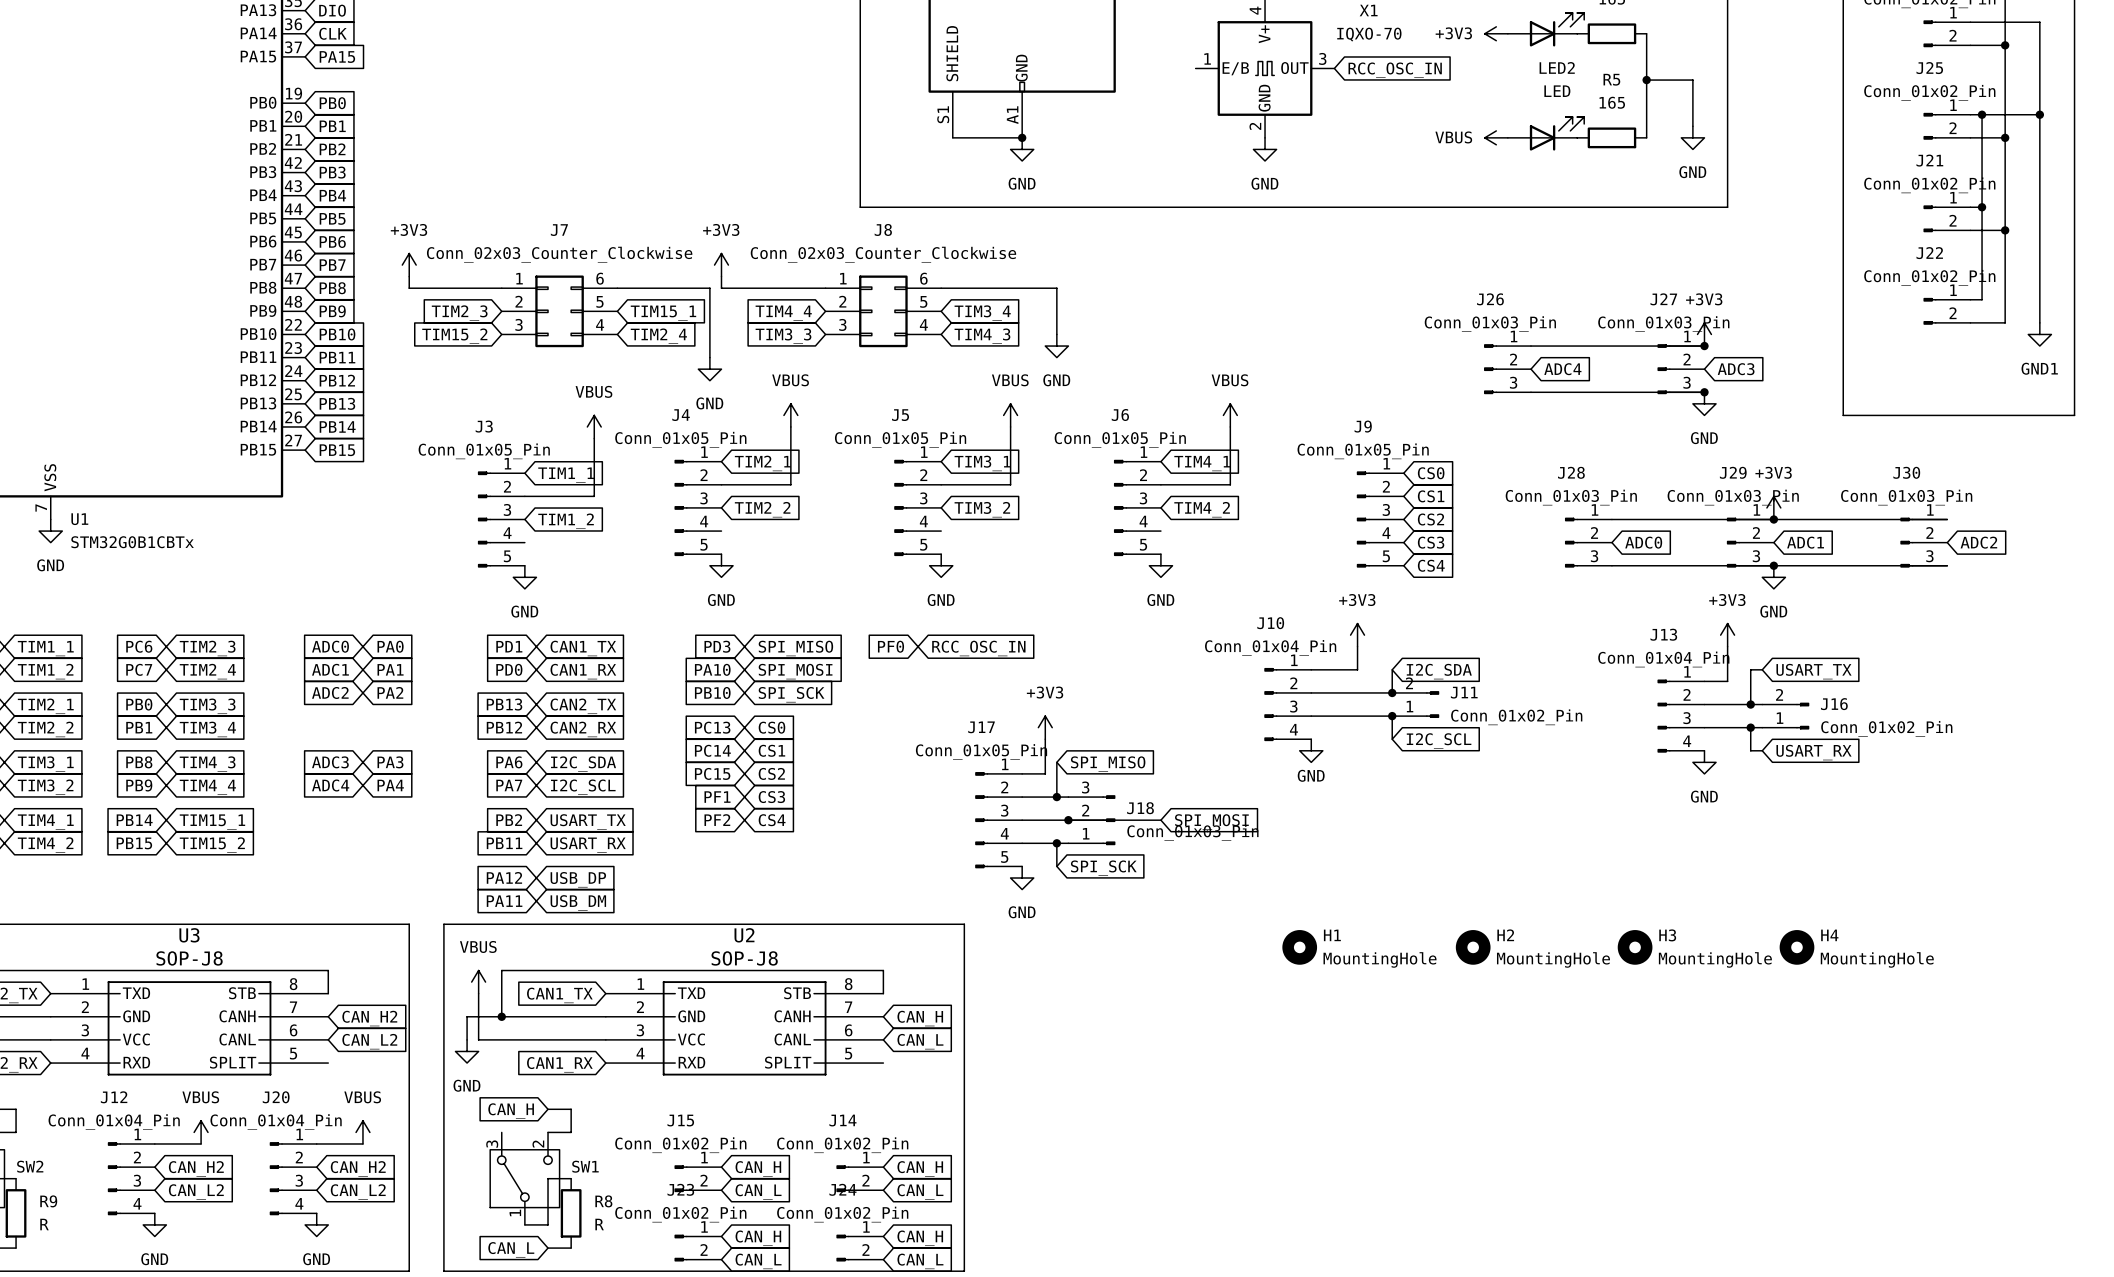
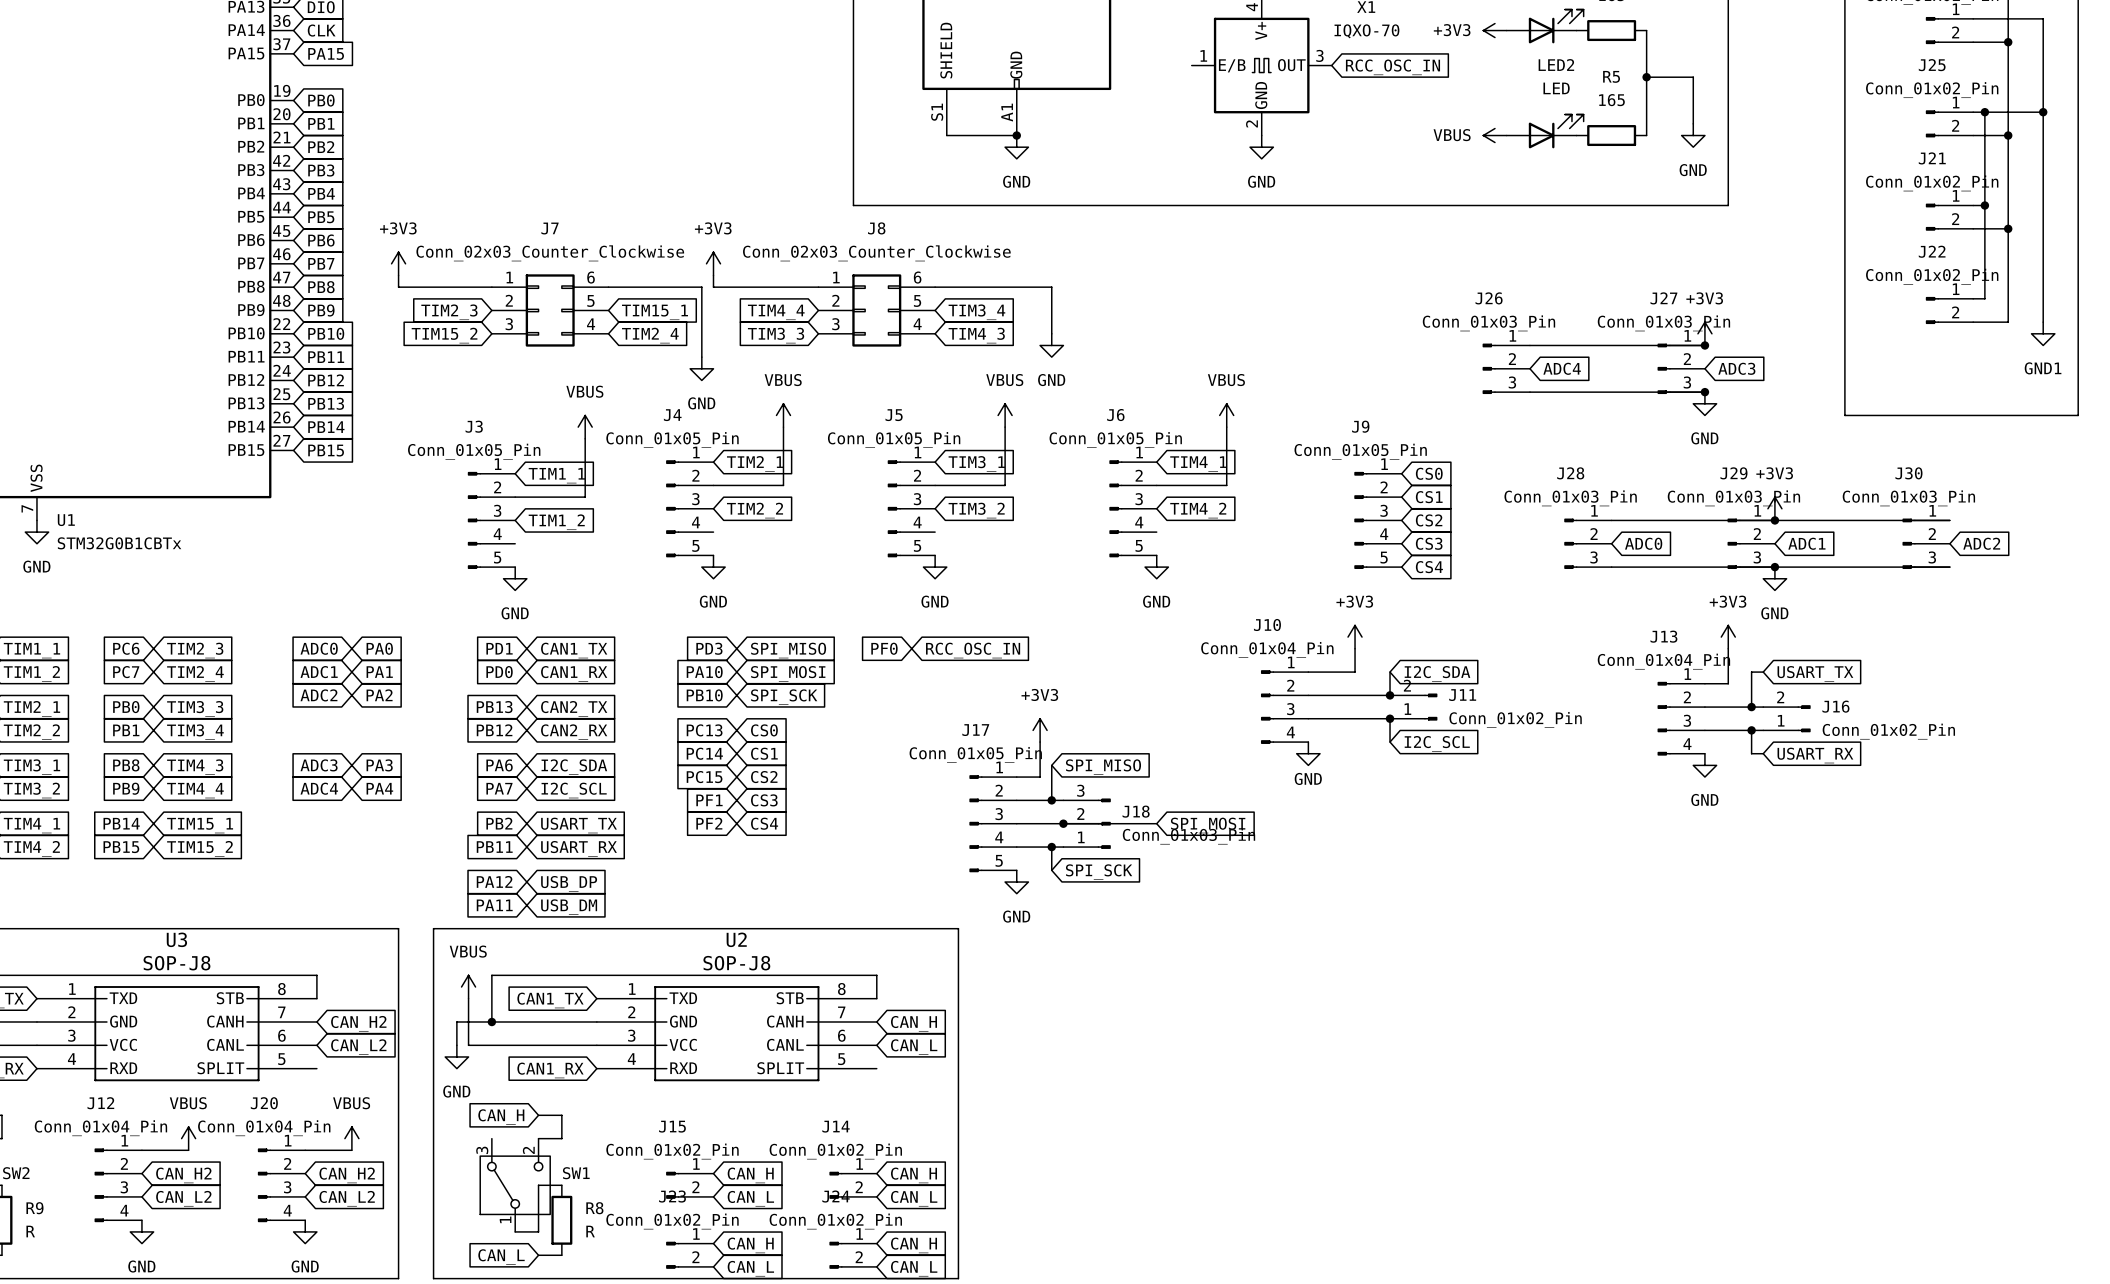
H1: MountingHole (1299, 947) -> none
H2: MountingHole (1473, 947) -> none
H3: MountingHole (1635, 947) -> none
H4: MountingHole (1796, 947) -> none

